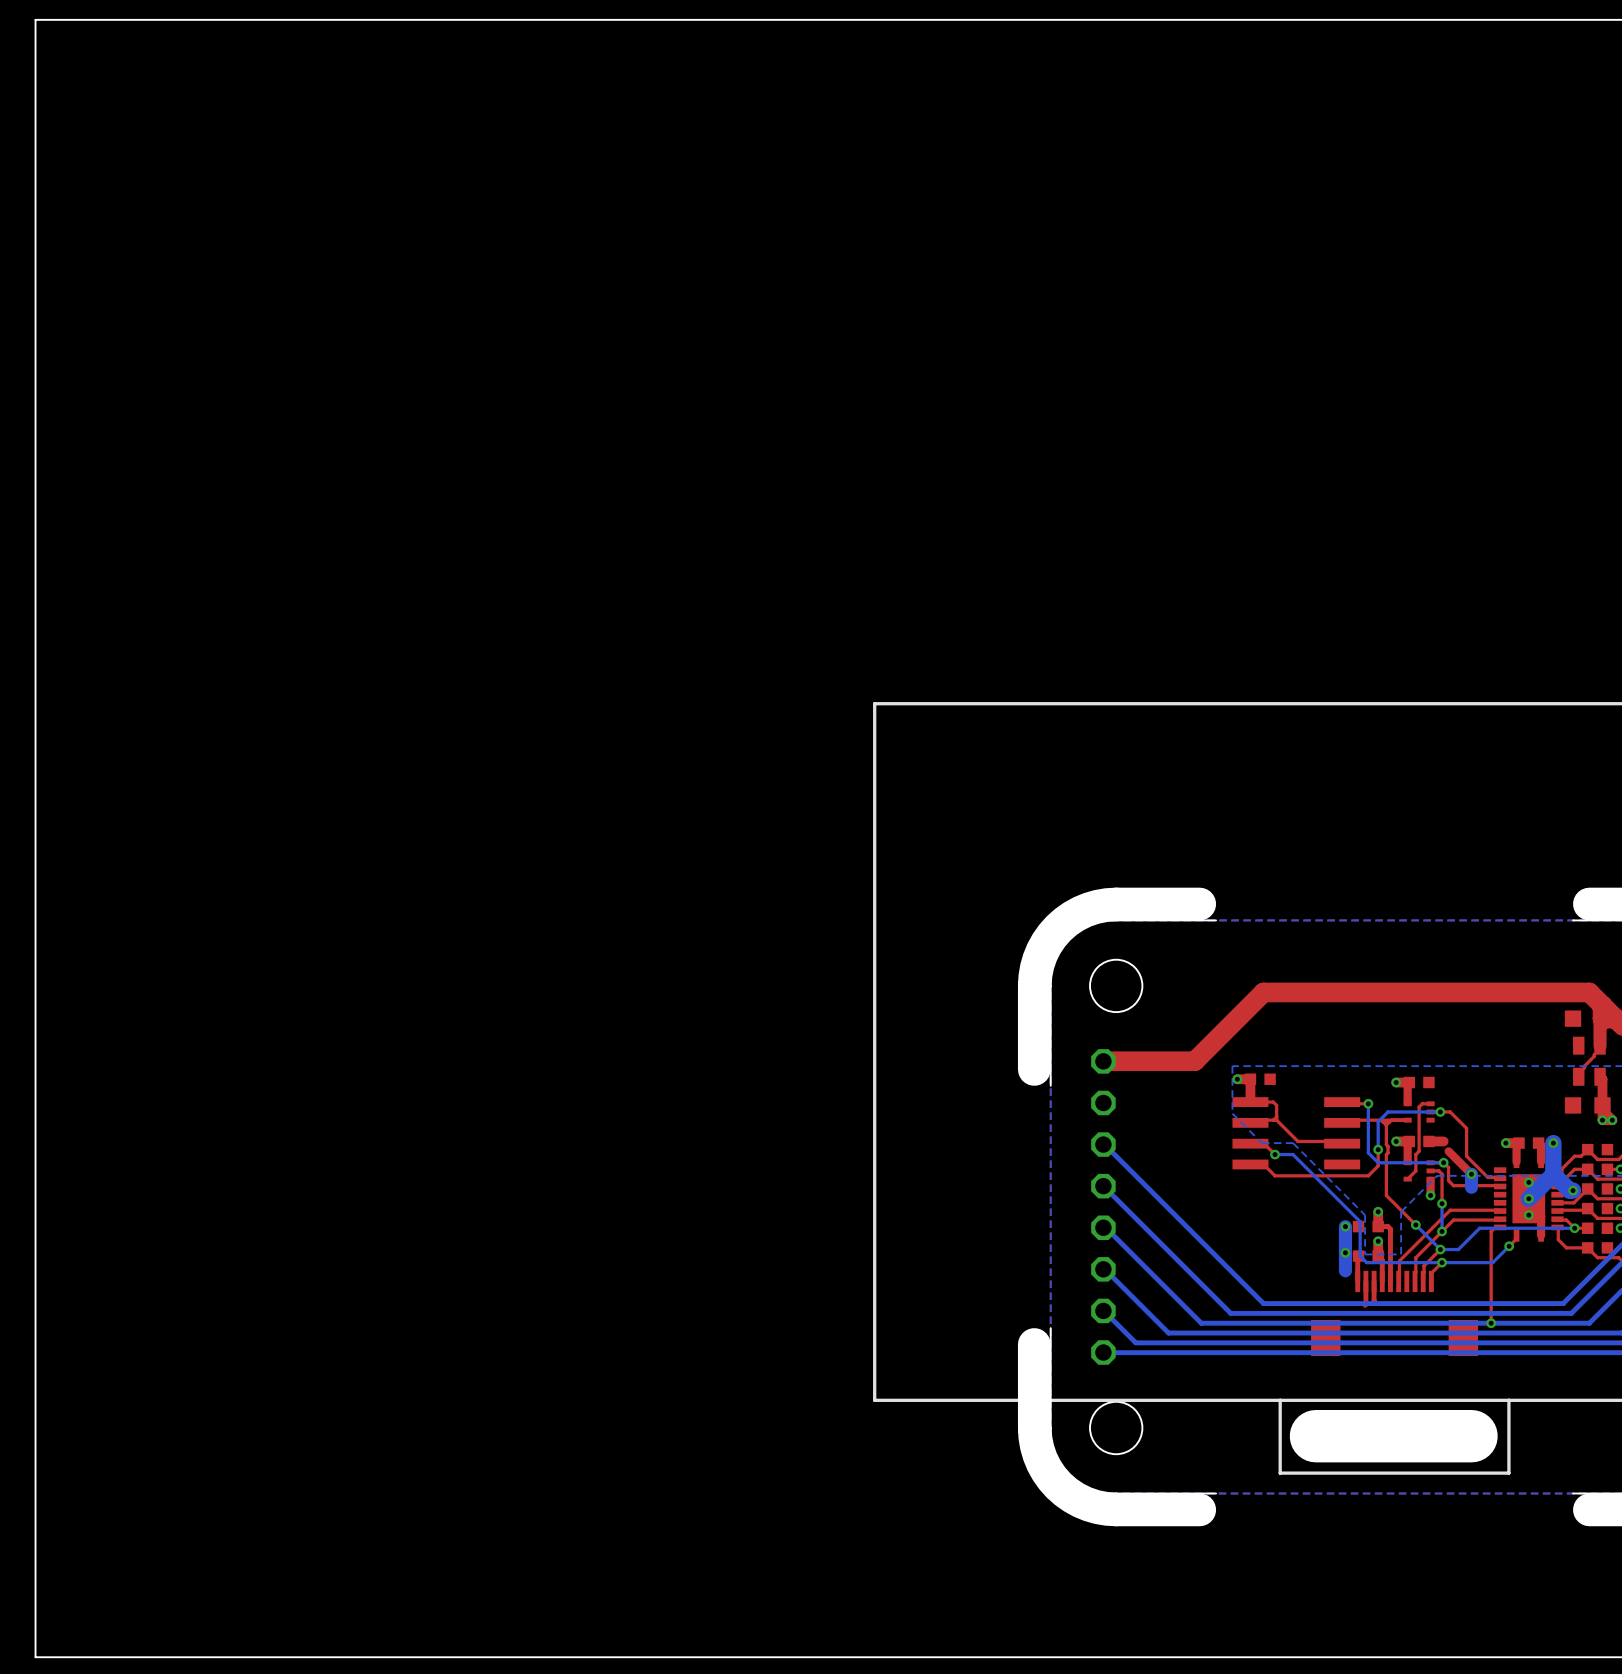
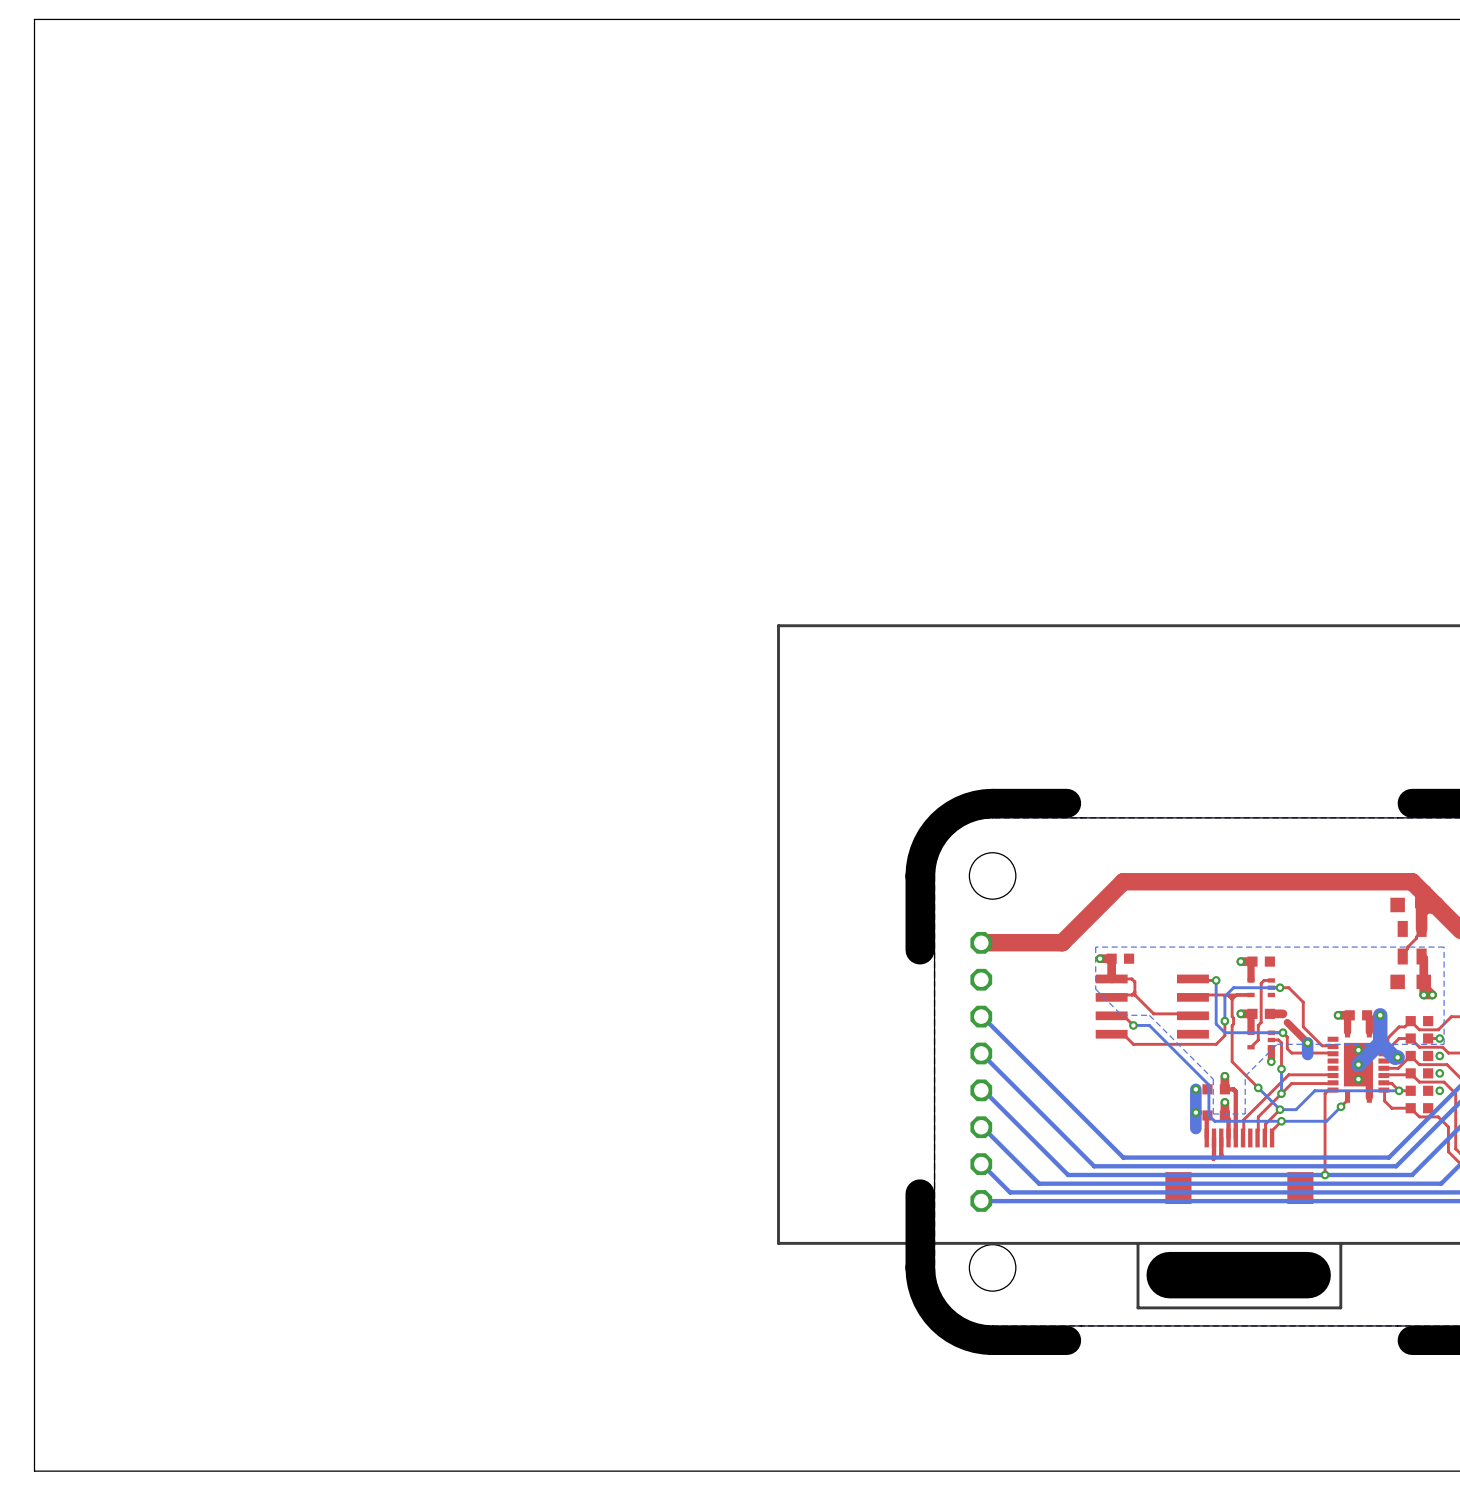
board edge: none -> (1397, 817) (1081, 817)
board edge: none -> (934, 964) (934, 1179)
board edge: none -> (1397, 1325) (1081, 1325)

